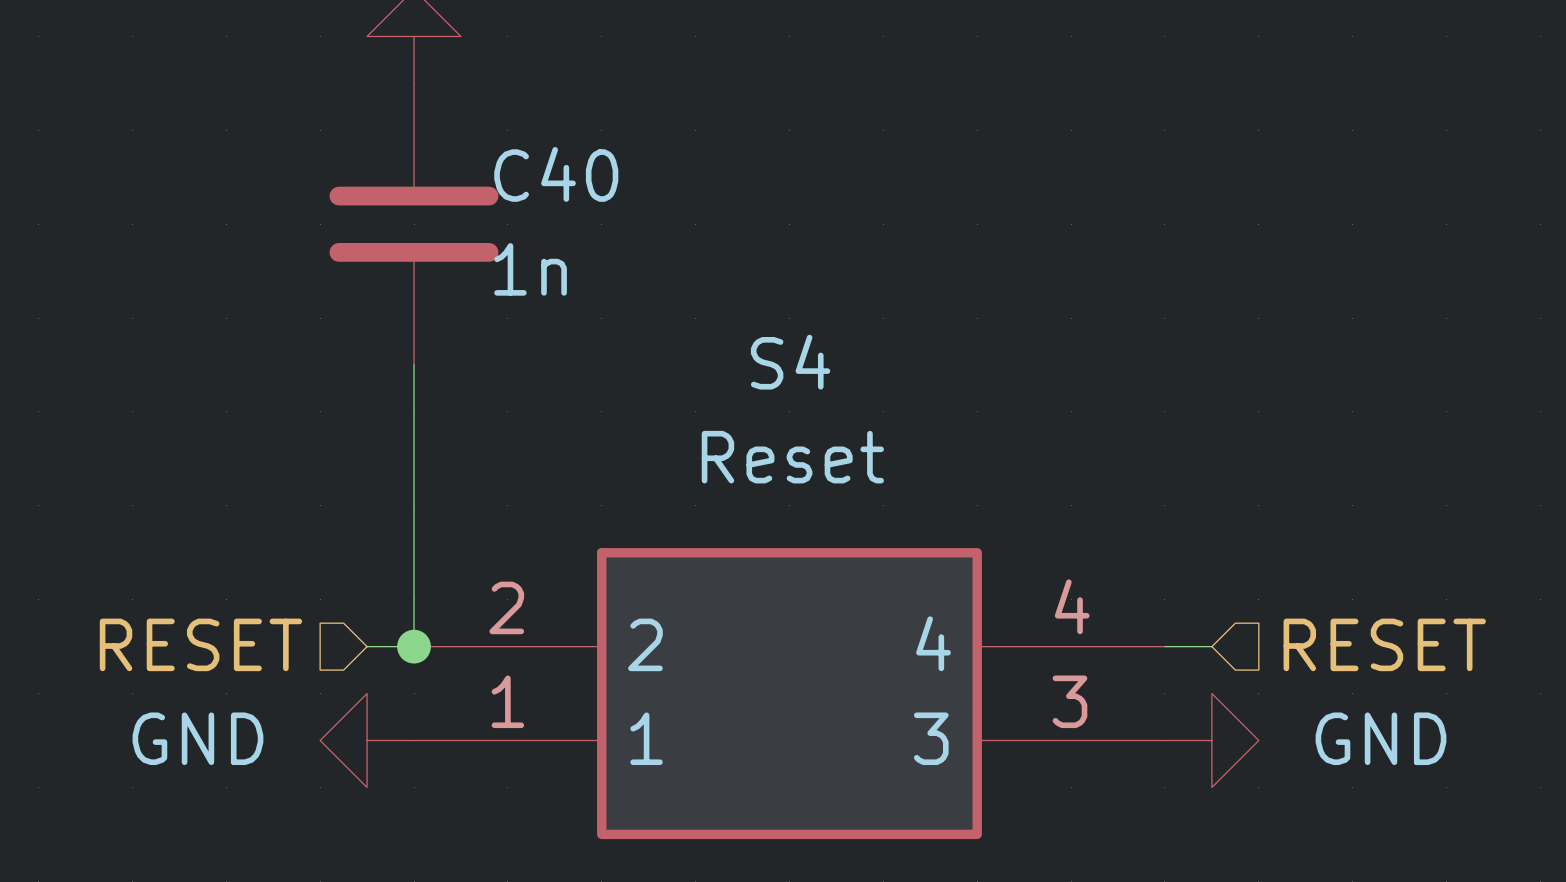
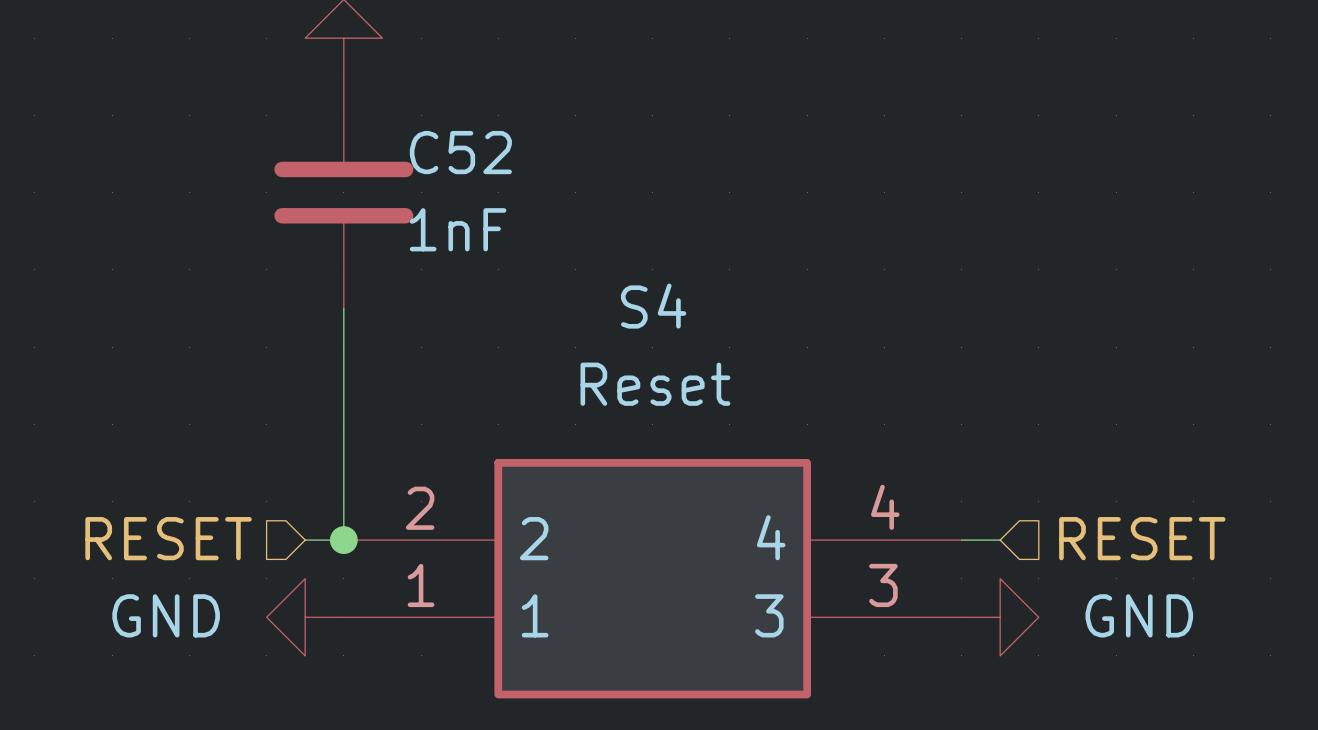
C40 name: C40 (556, 174) -> C52 (460, 152)
C40 value: 1n (530, 269) -> 1nF (458, 229)

